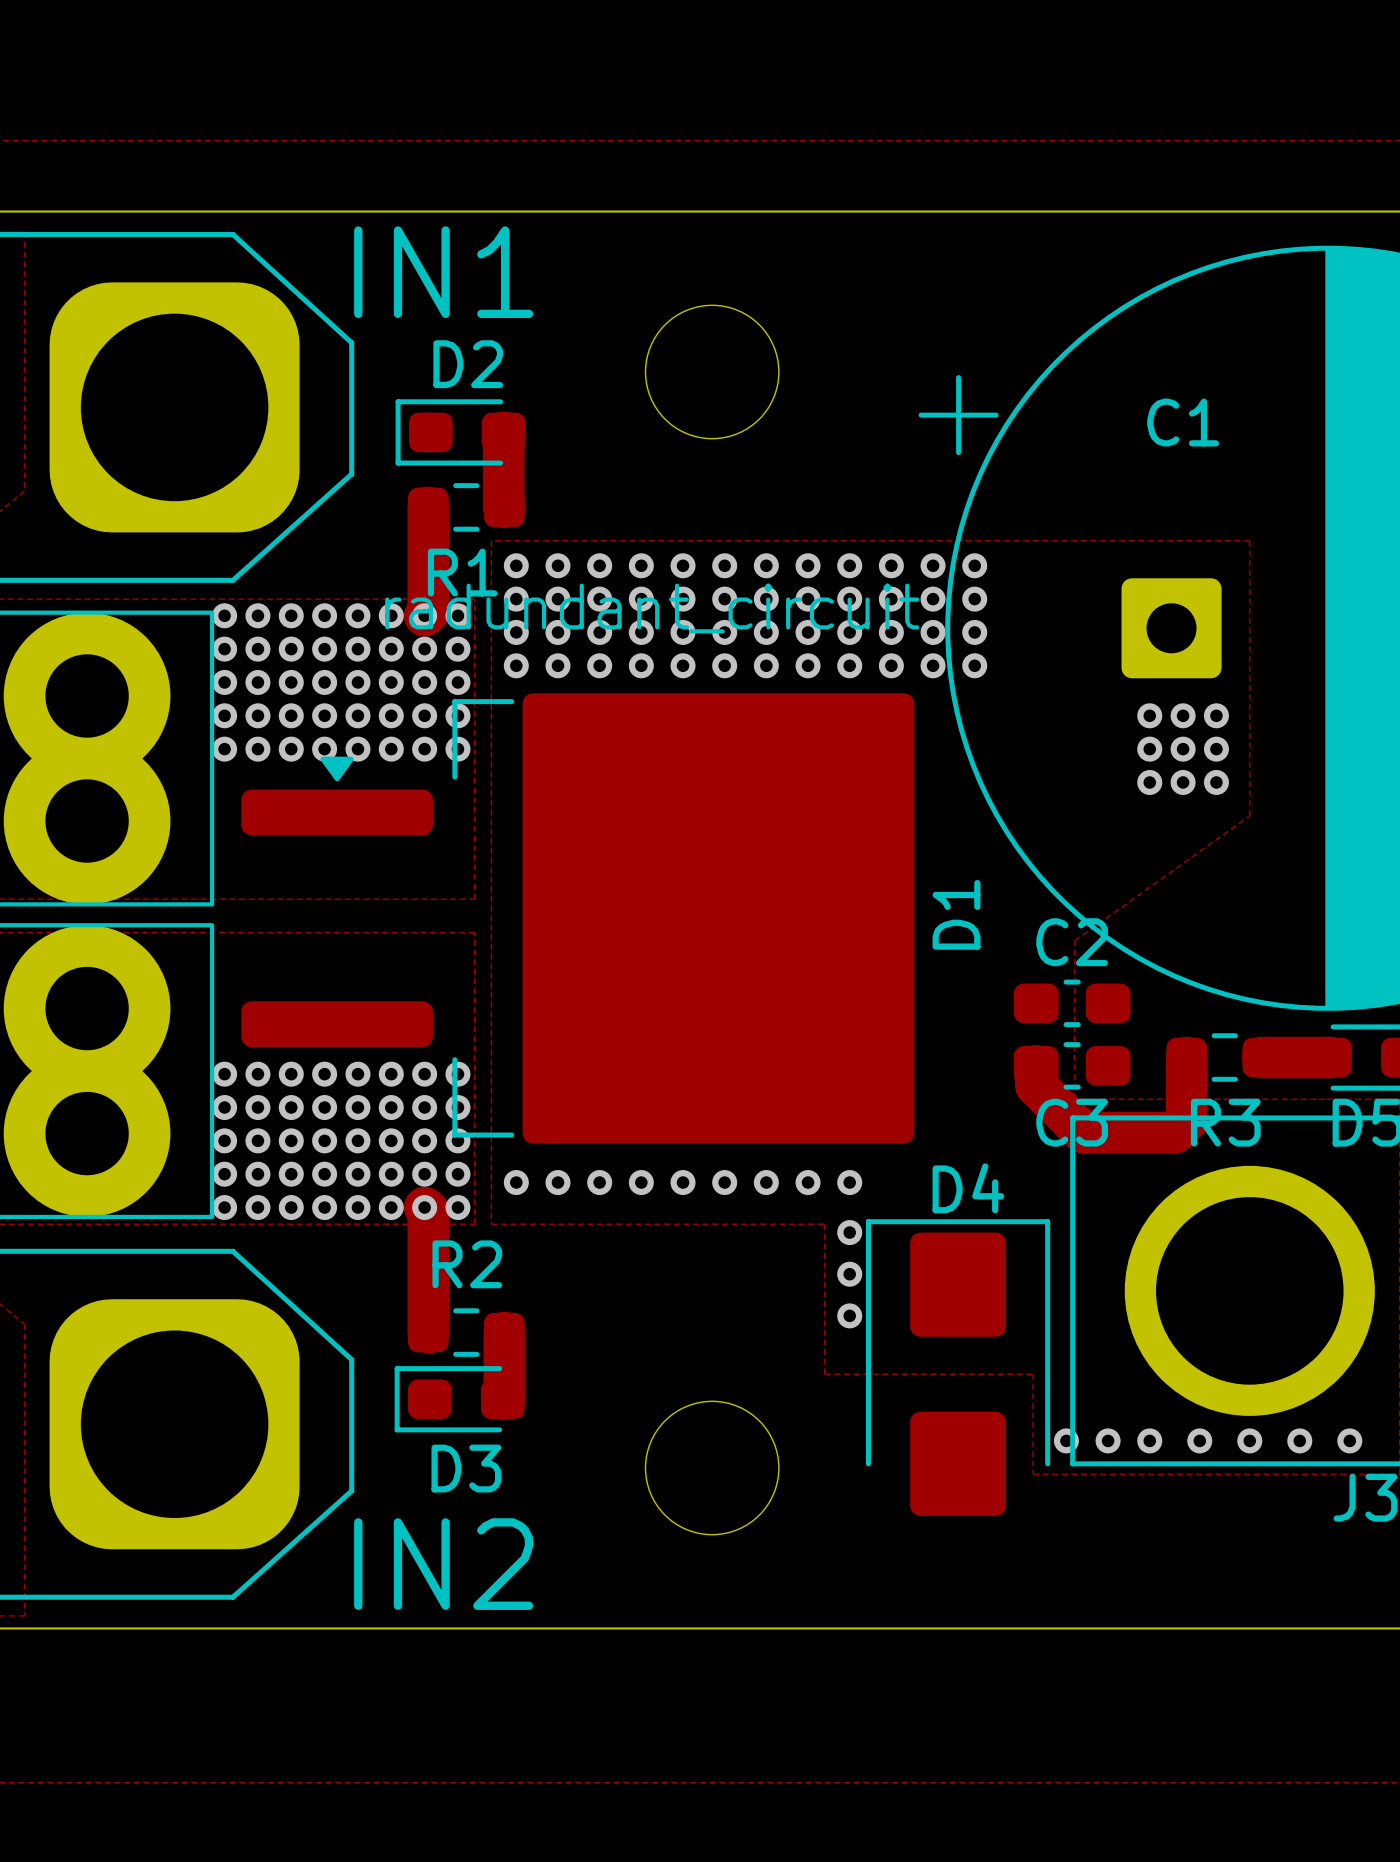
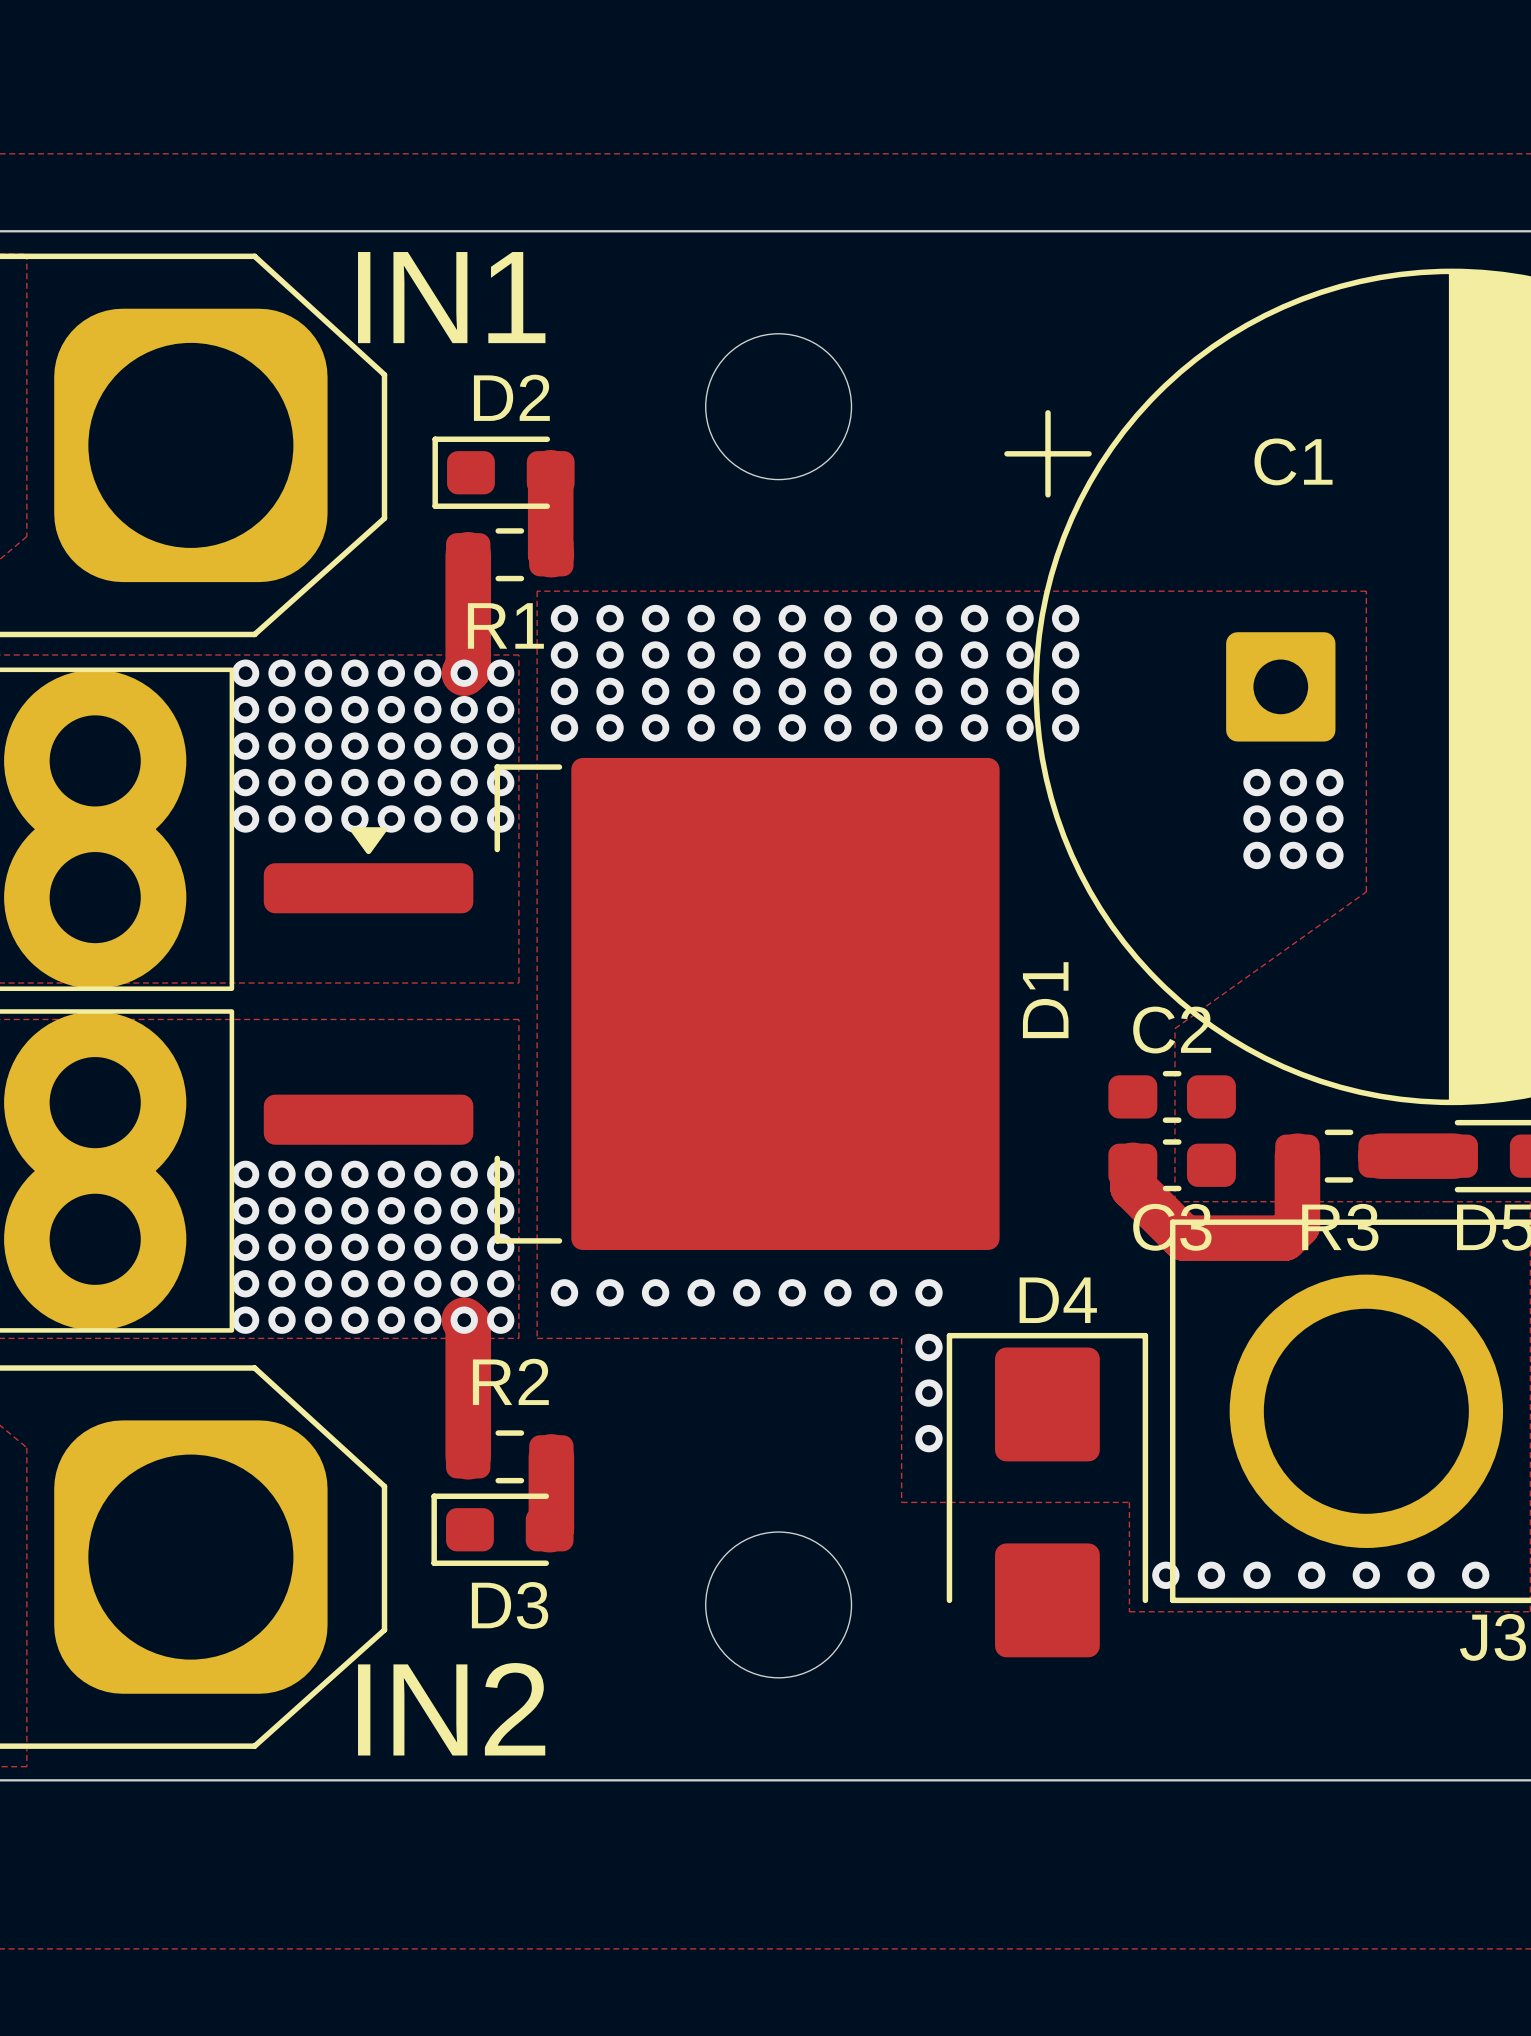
text position: IN1 (443, 272) -> IN1 (451, 297)
text: radundant_circuit (652, 608) -> none
text position: IN2 (443, 1564) -> IN2 (451, 1709)

